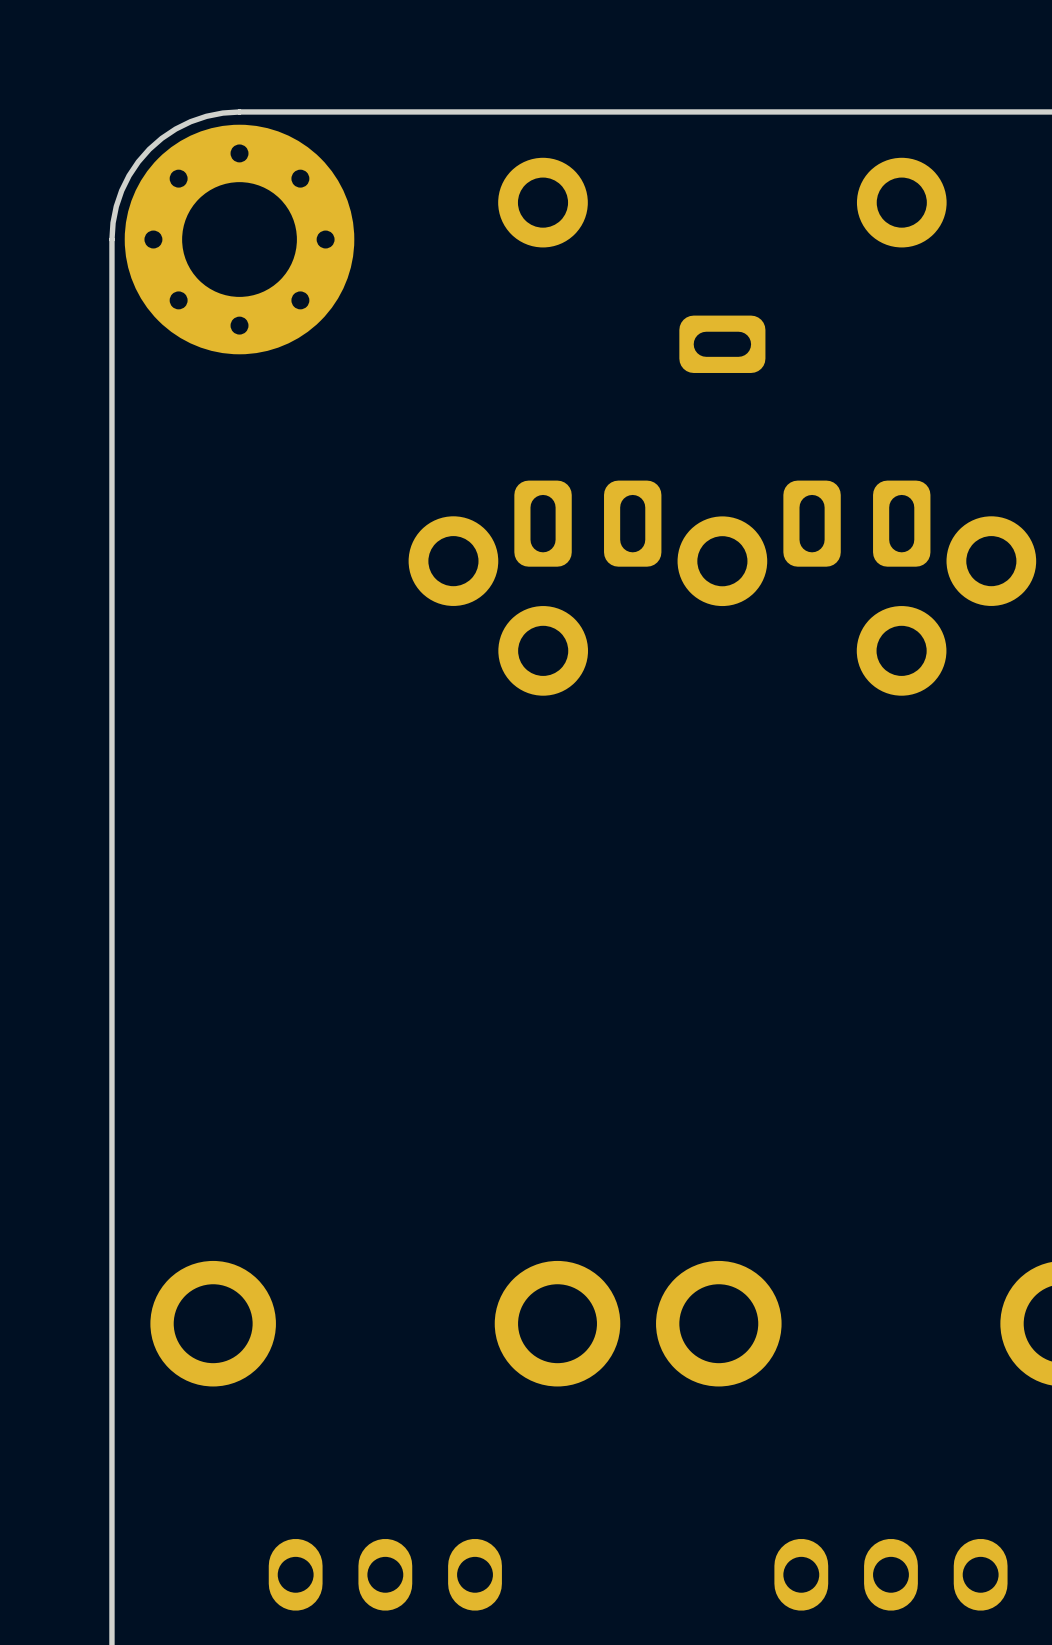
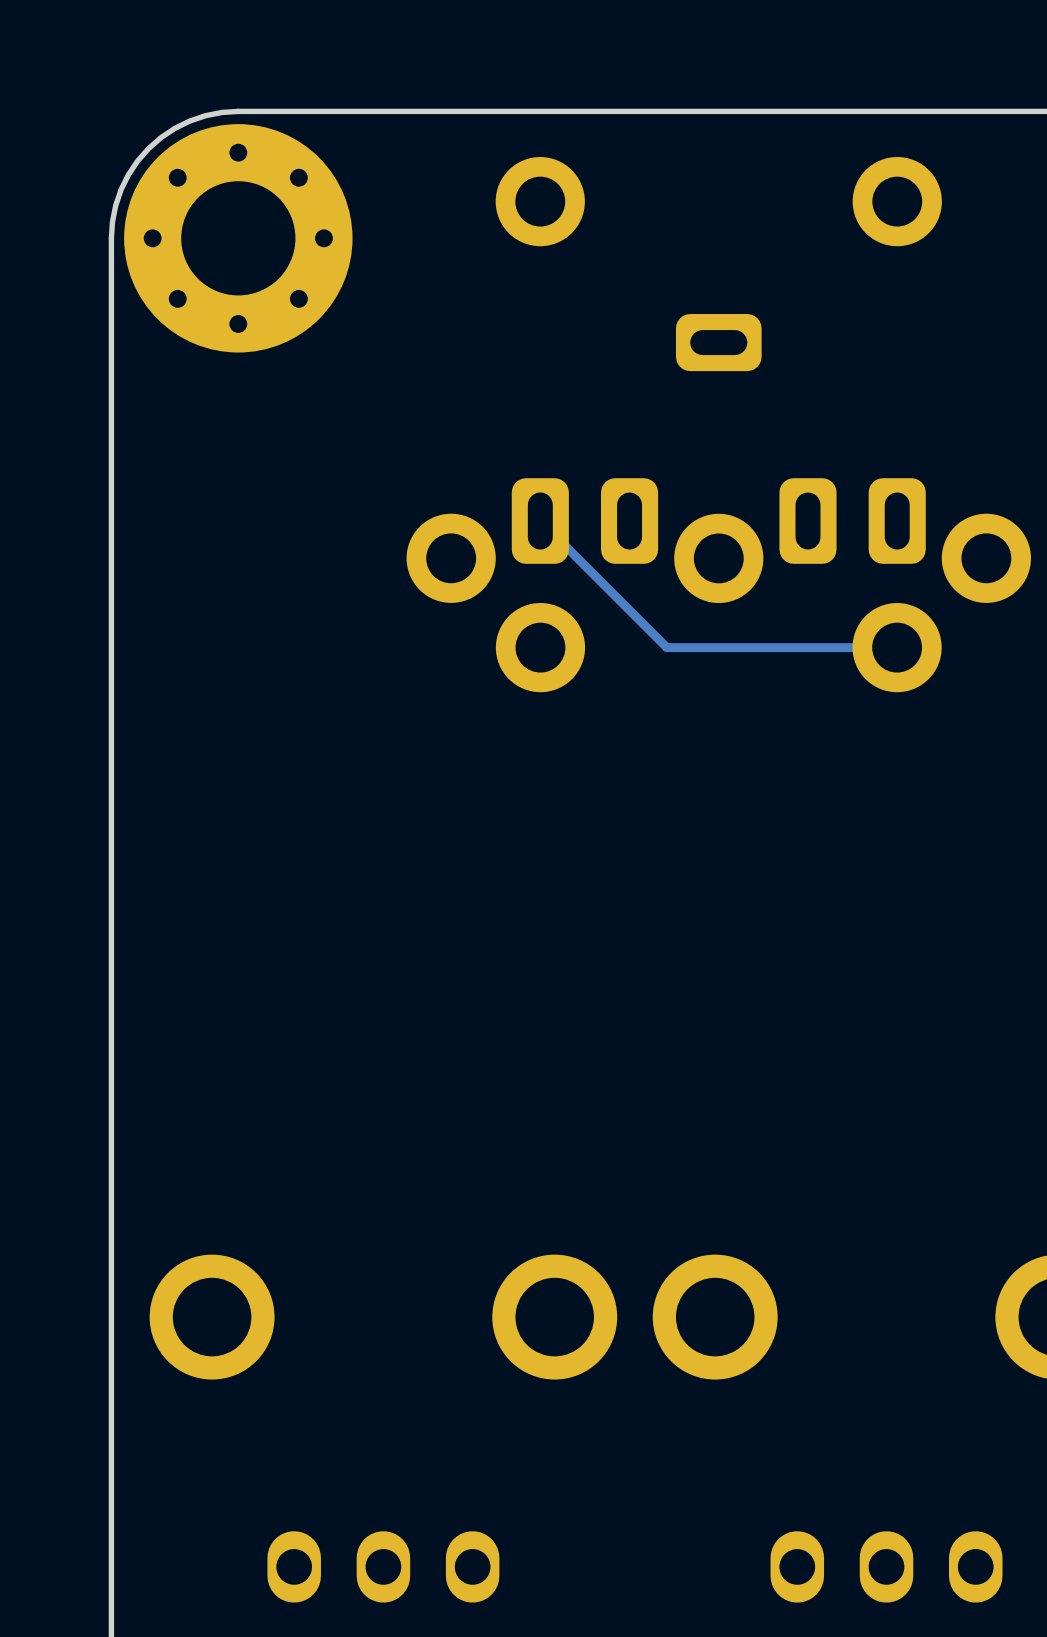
track: none -> (540, 521) (666, 647) (897, 647)

